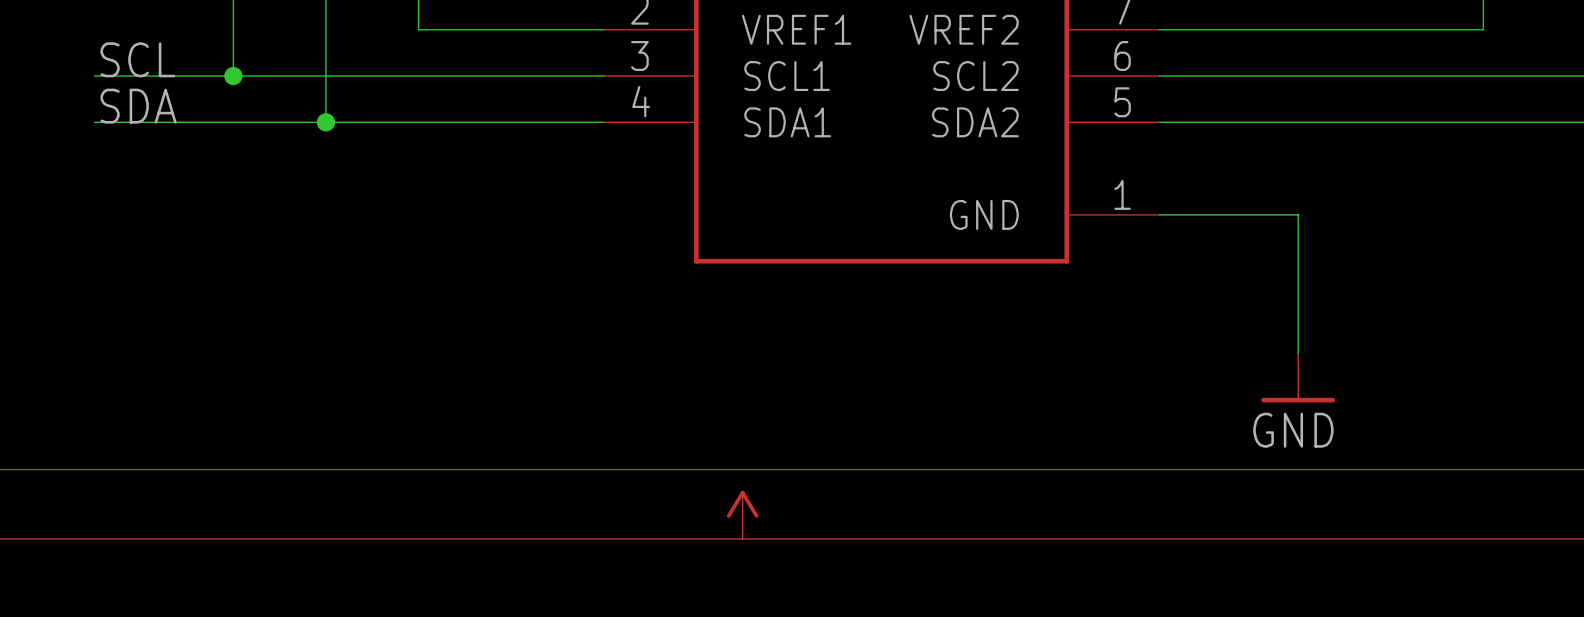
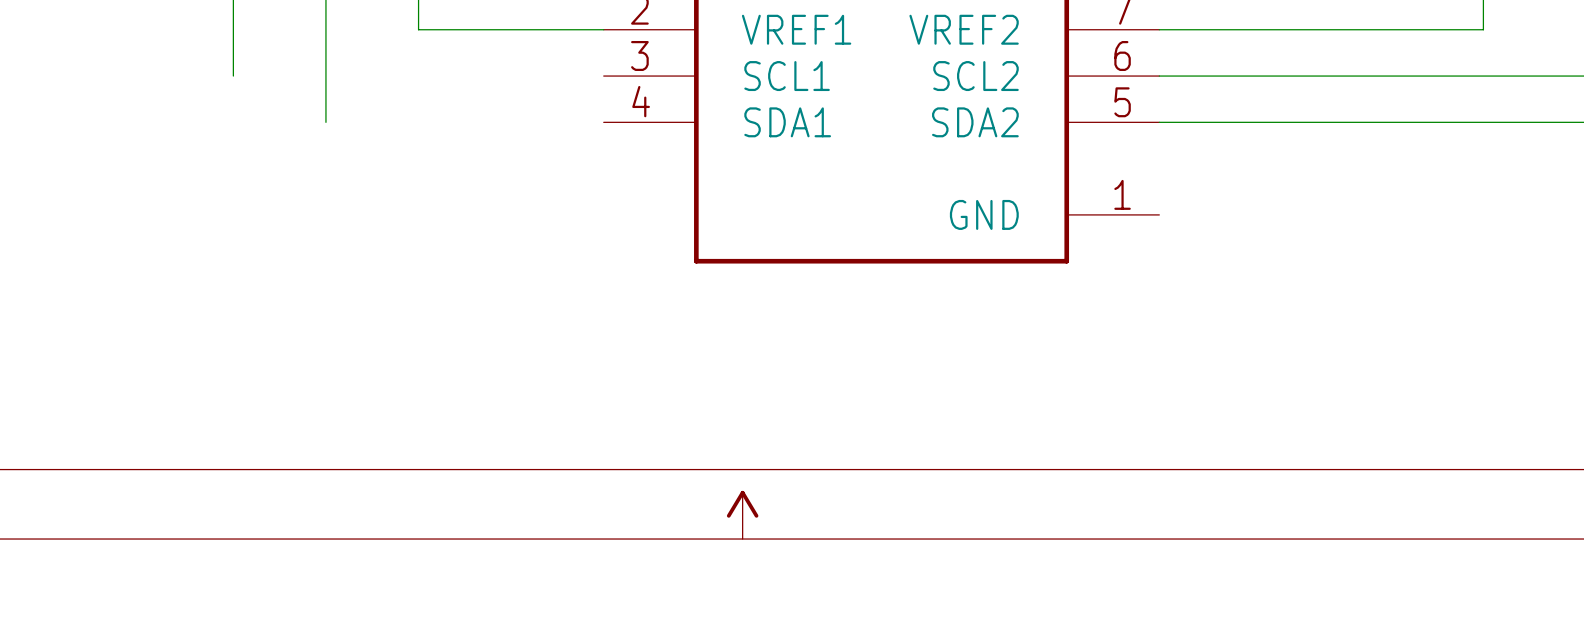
label: SCL (137, 59) -> none
wire: (94, 76) (603, 76) -> none
junction: (233, 76) -> none
label: SDA (138, 106) -> none
wire: (94, 122) (603, 122) -> none
junction: (325, 122) -> none
wire: (1159, 214) (1298, 214) (1298, 353) -> none
power symbol: GND (1298, 378) -> none

